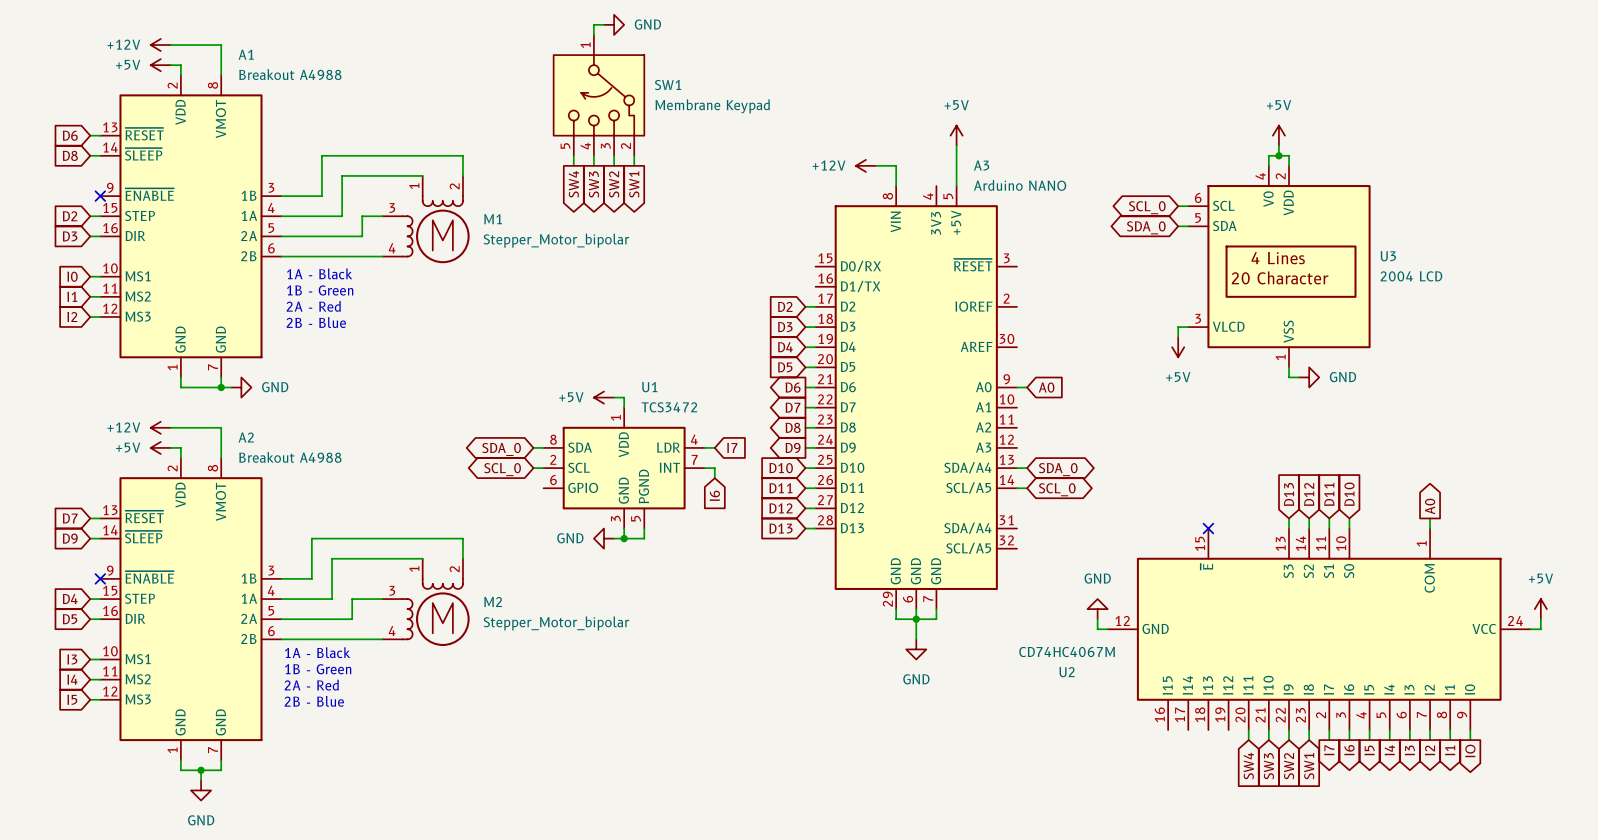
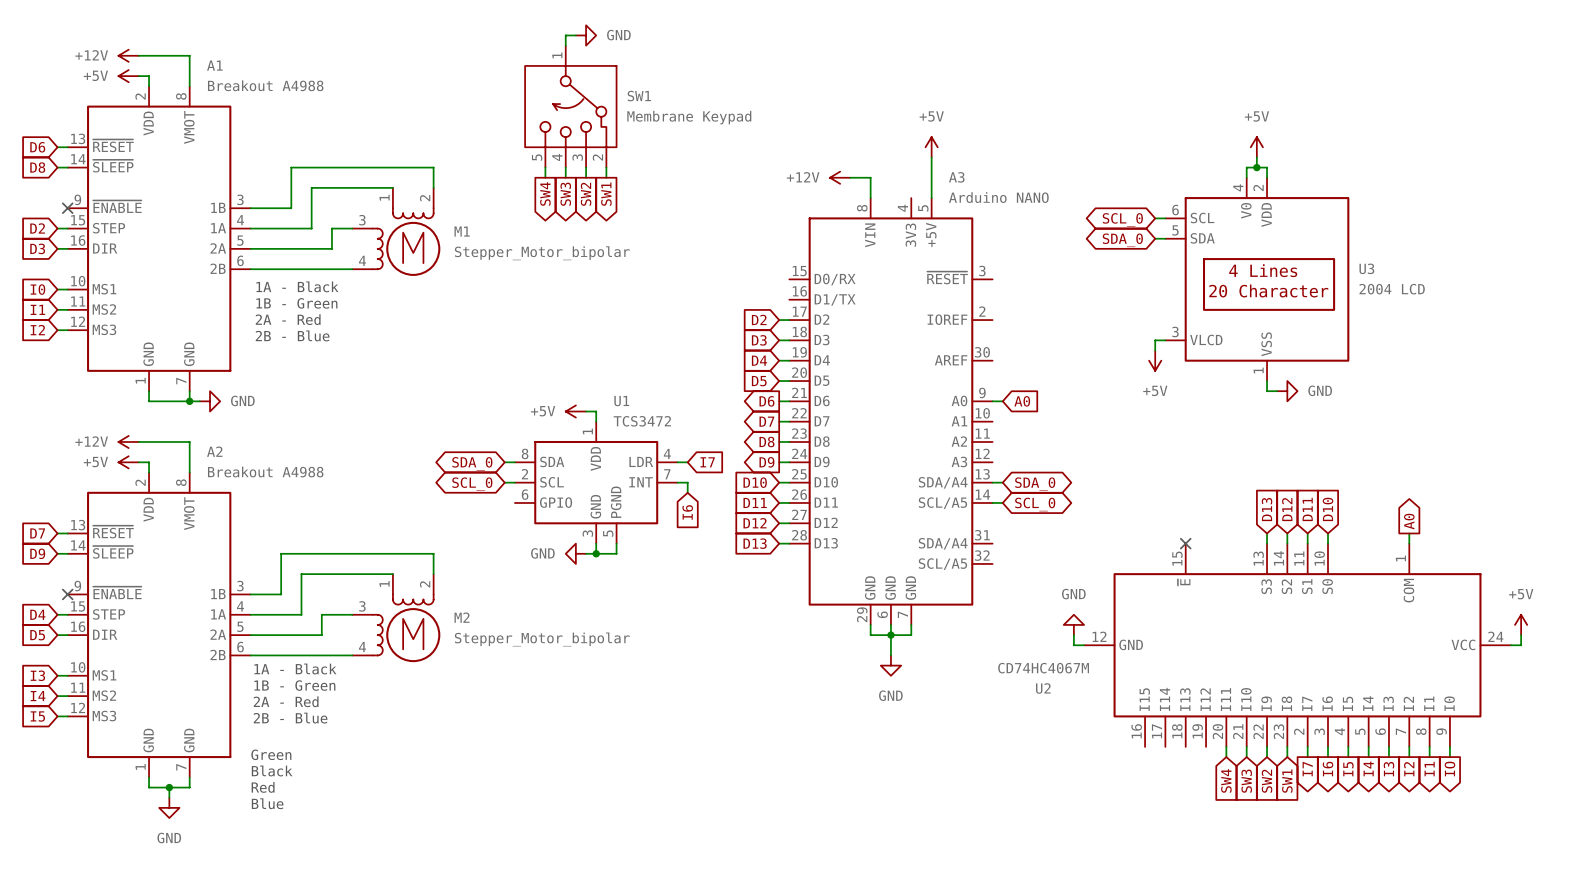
text: none -> Green (271, 754)
text: none -> Black (272, 771)
text: none -> Red (263, 787)
text: none -> Blue (267, 803)

